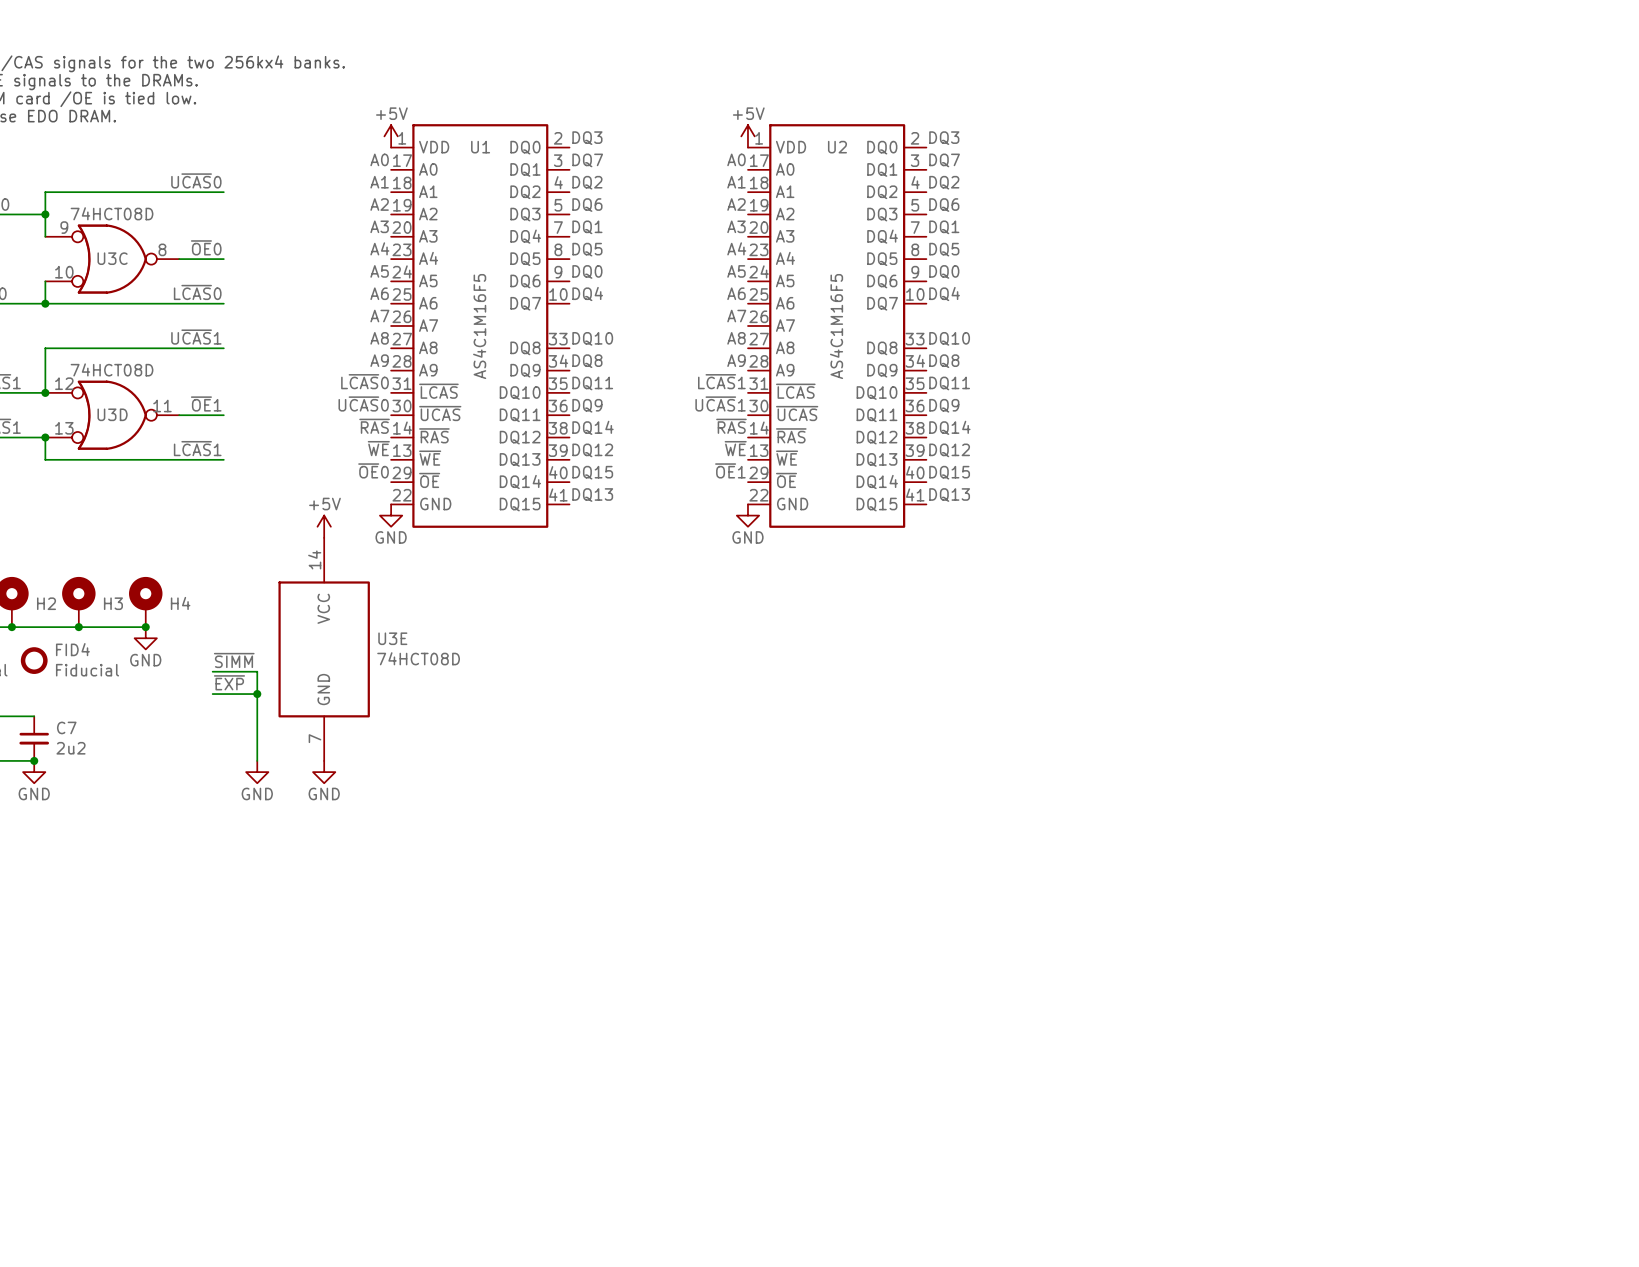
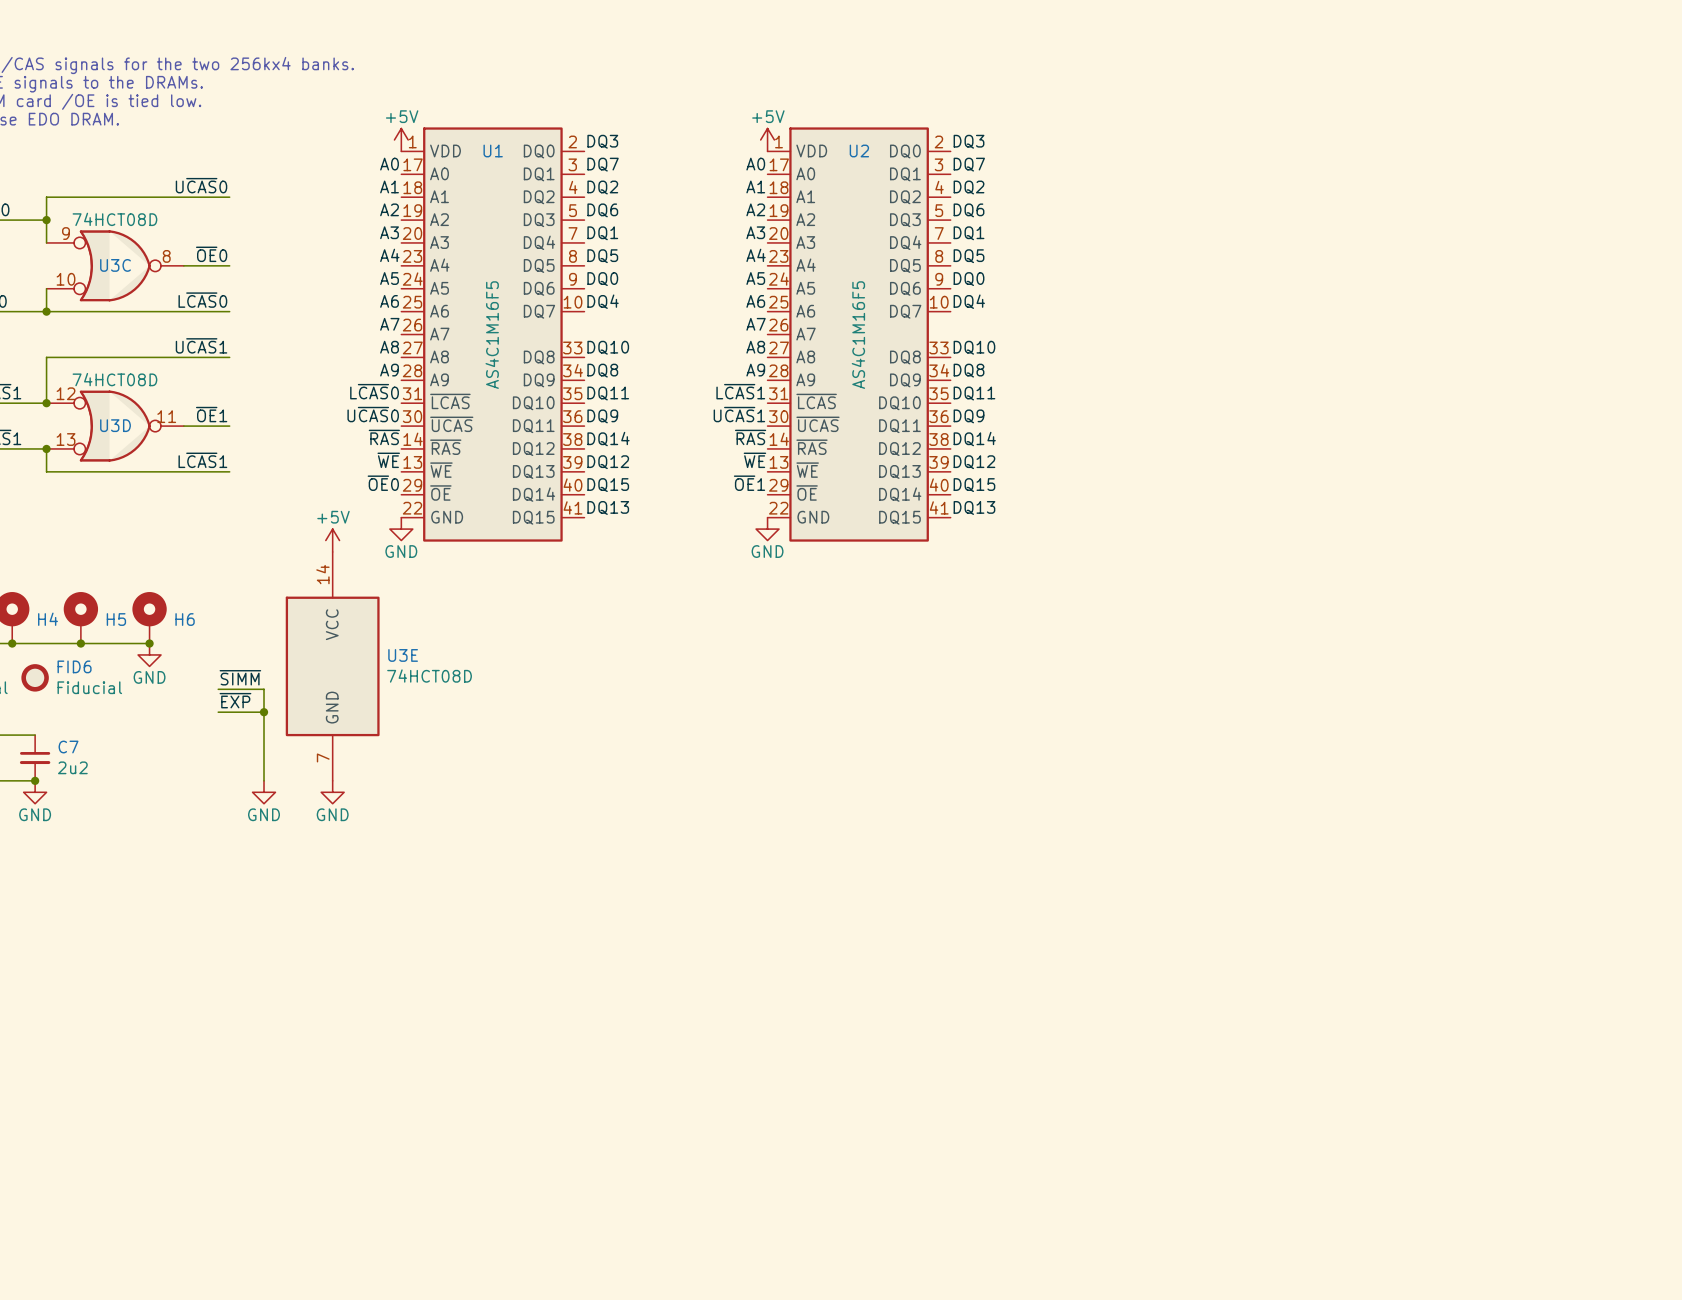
H2 name: H2 (46, 603) -> H4 (48, 619)
H3 name: H3 (113, 603) -> H5 (116, 619)
H4 name: H4 (180, 603) -> H6 (185, 619)
FID4 name: FID4 (72, 649) -> FID6 (74, 666)

